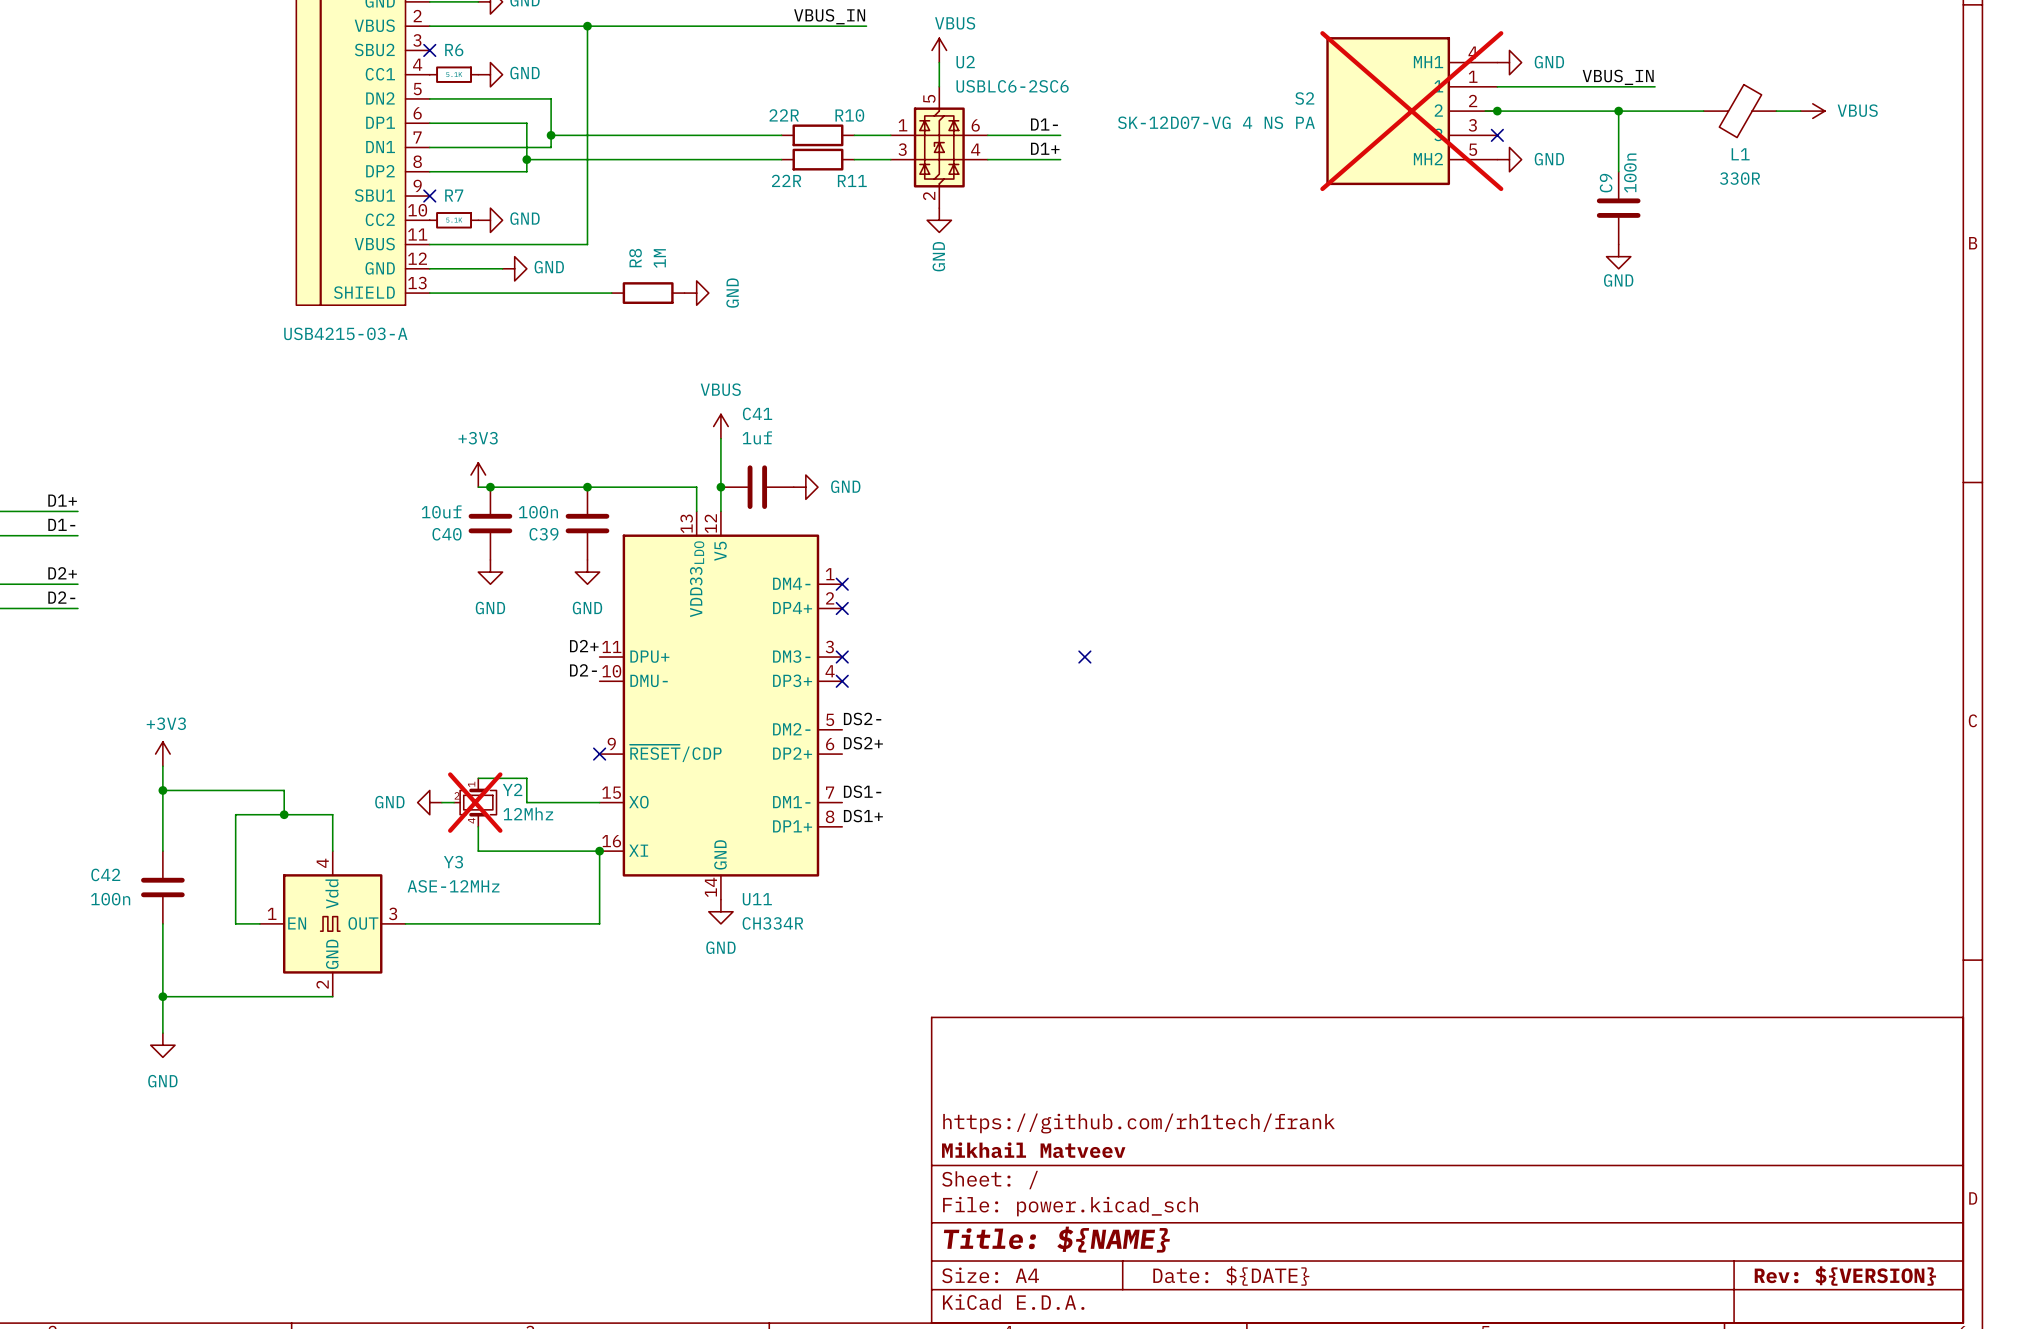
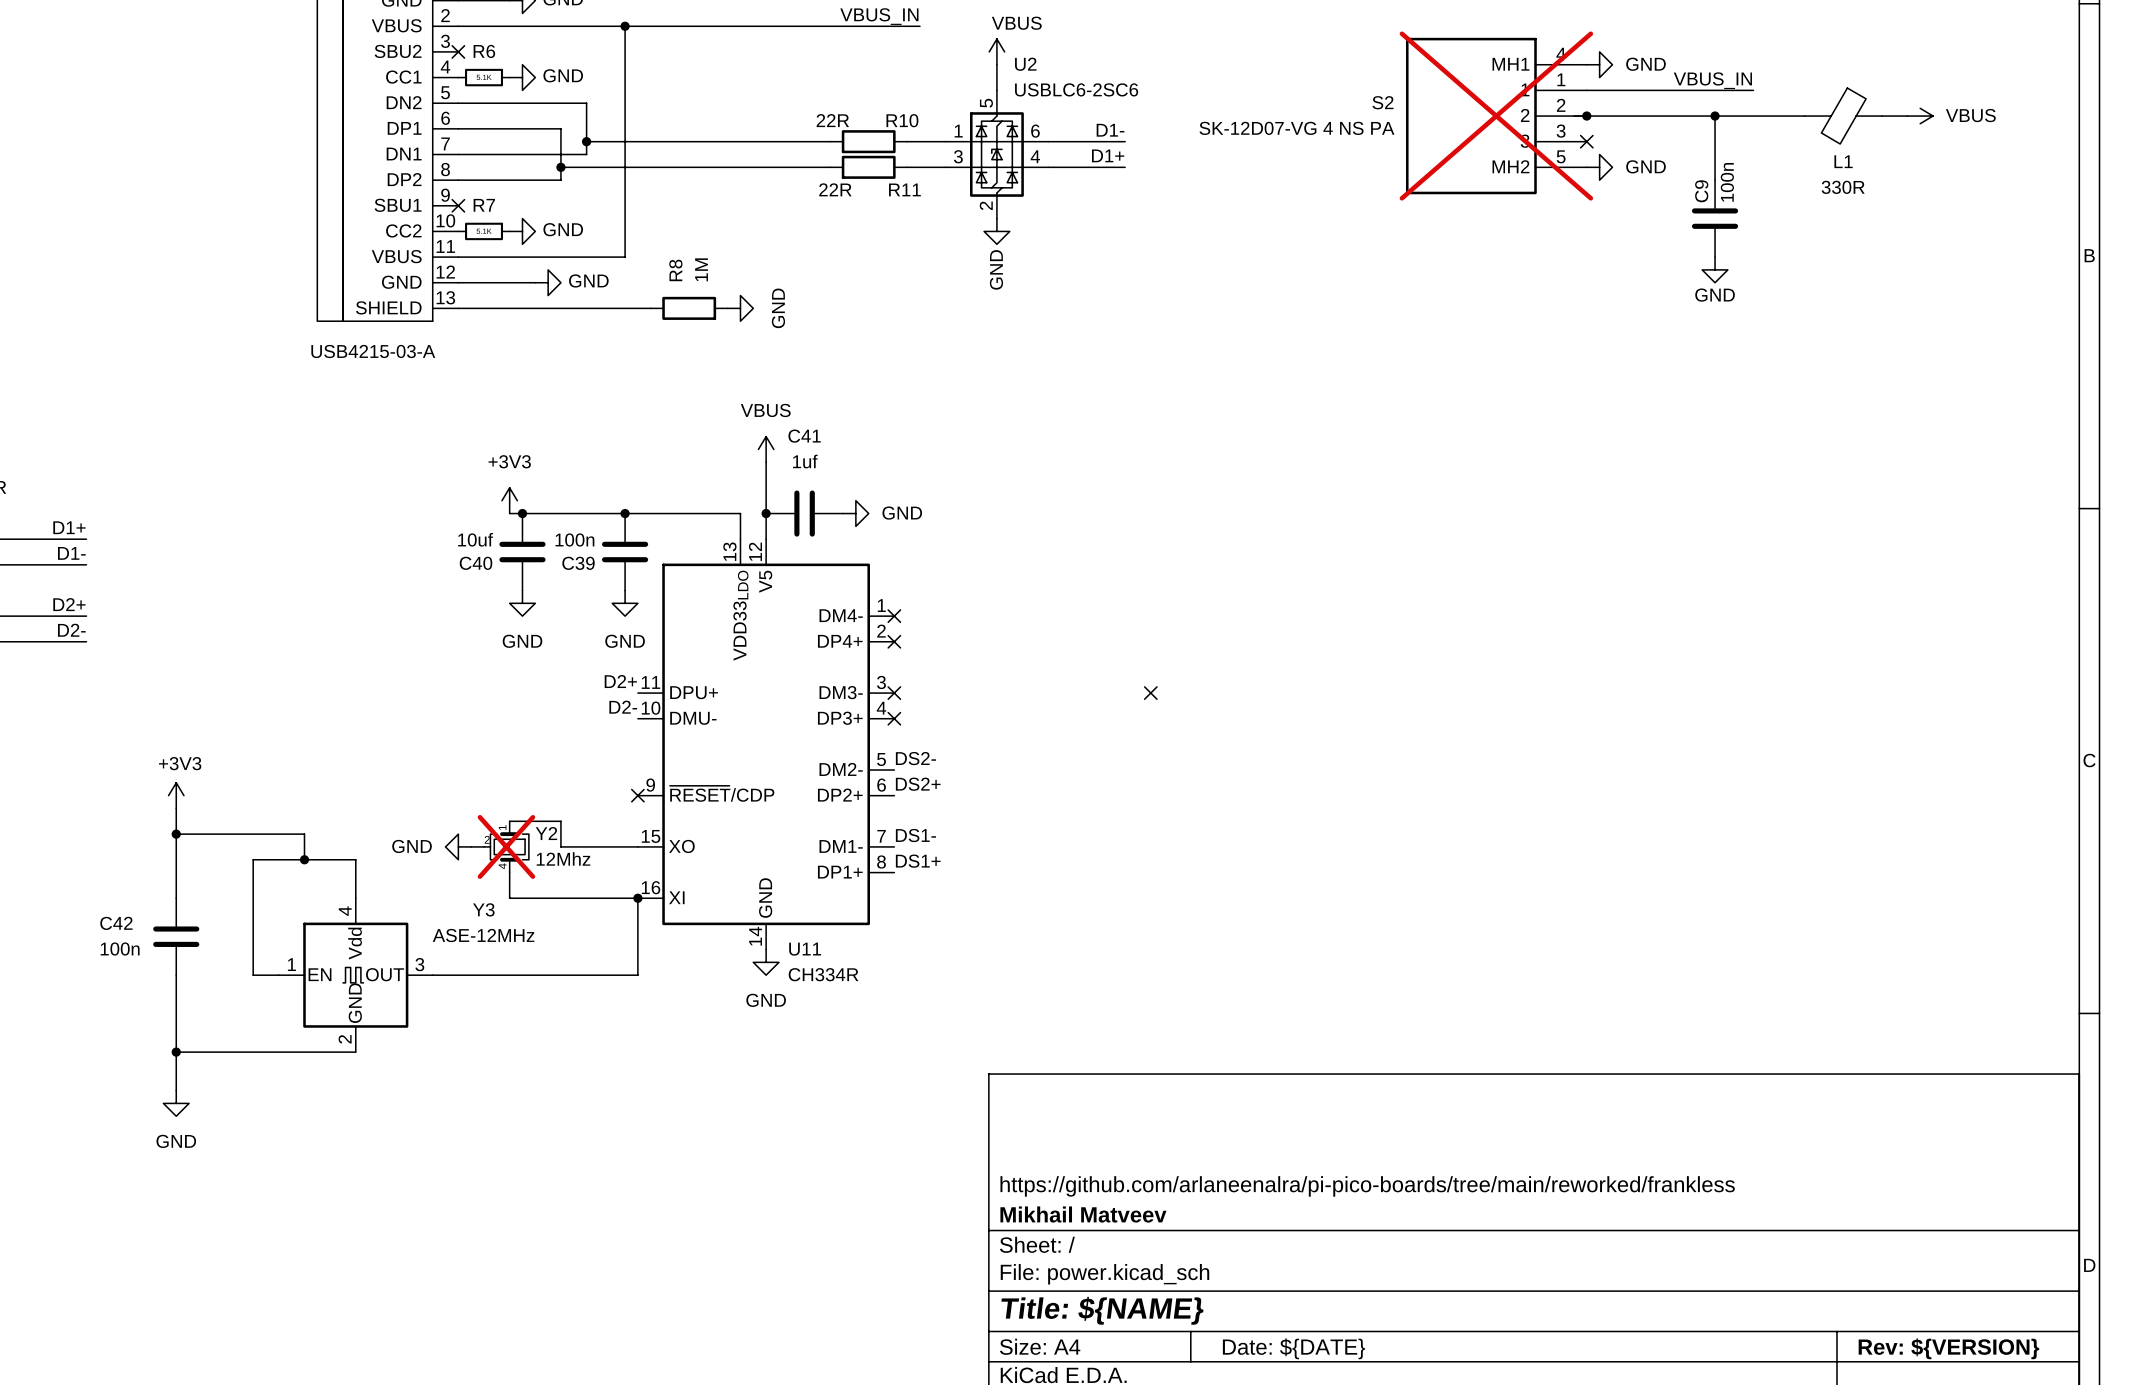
title block: https://github.com/rh1tech/frank (1139, 1123) -> https://github.com/arlaneenalra/pi-pico-boards/tree/main/reworked/frankless (1367, 1186)

